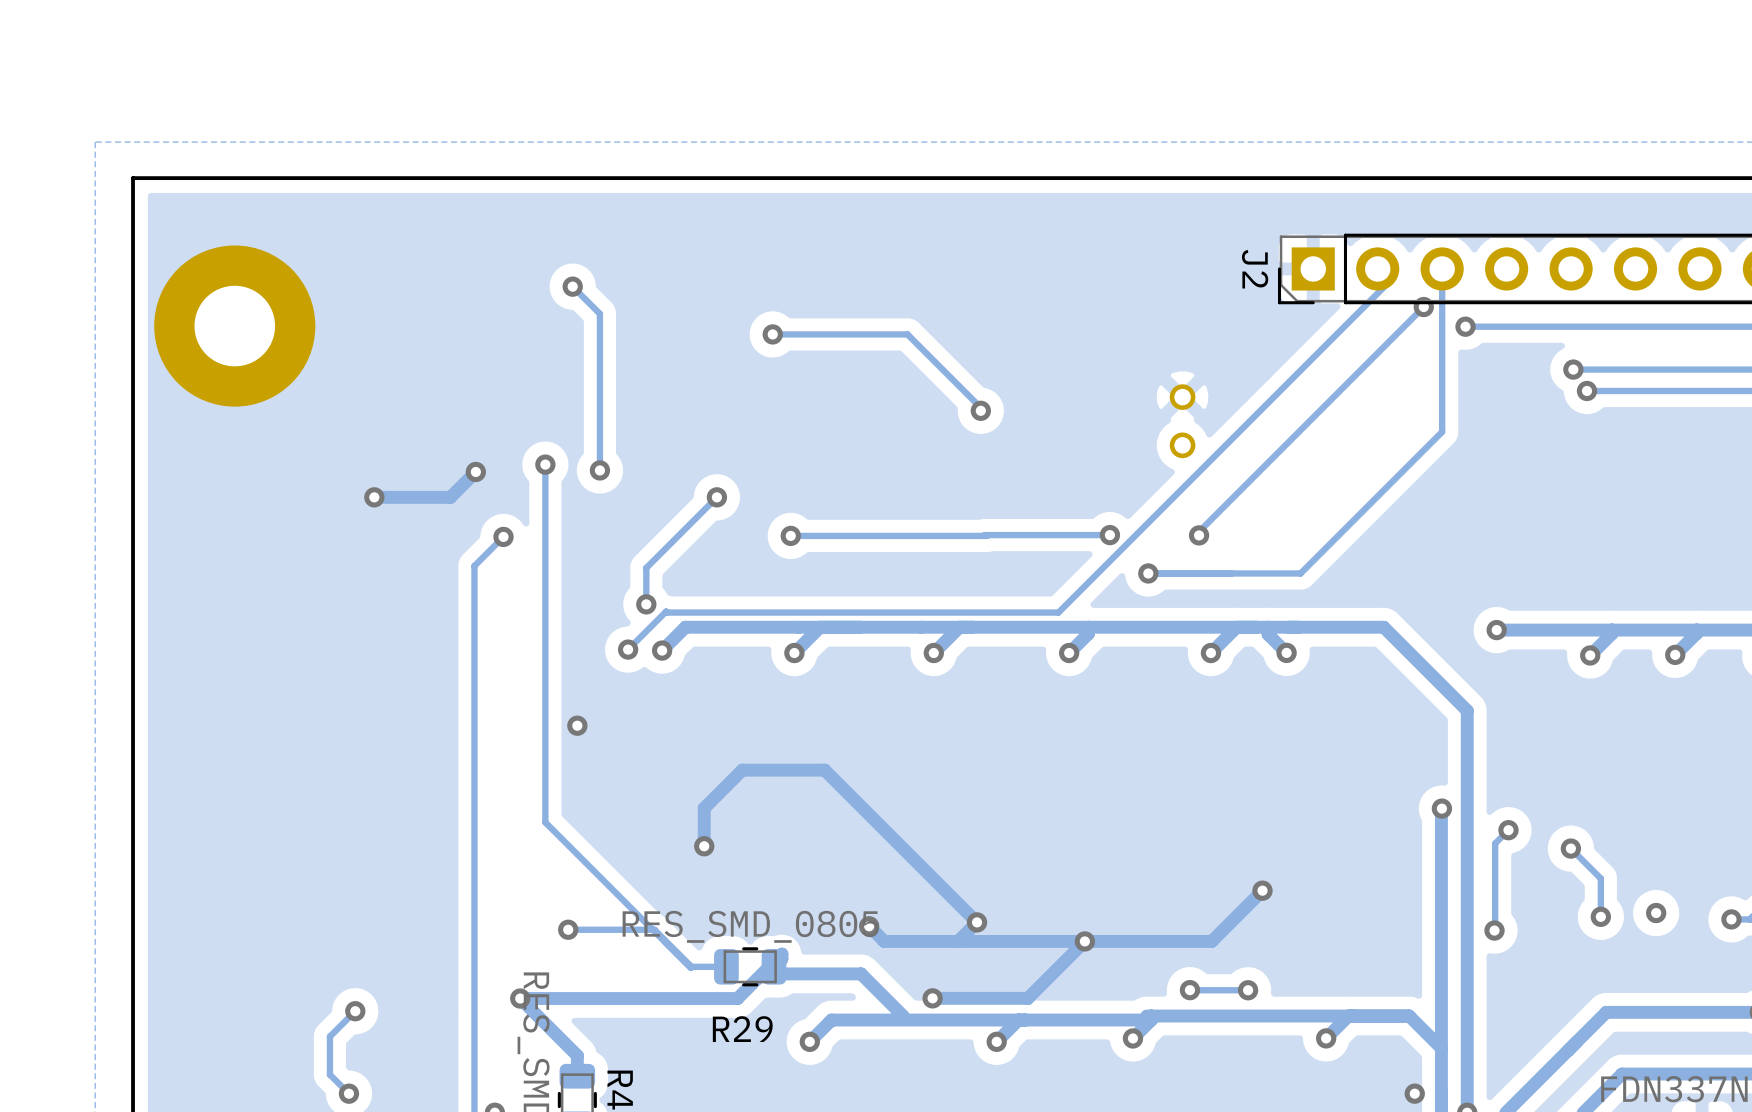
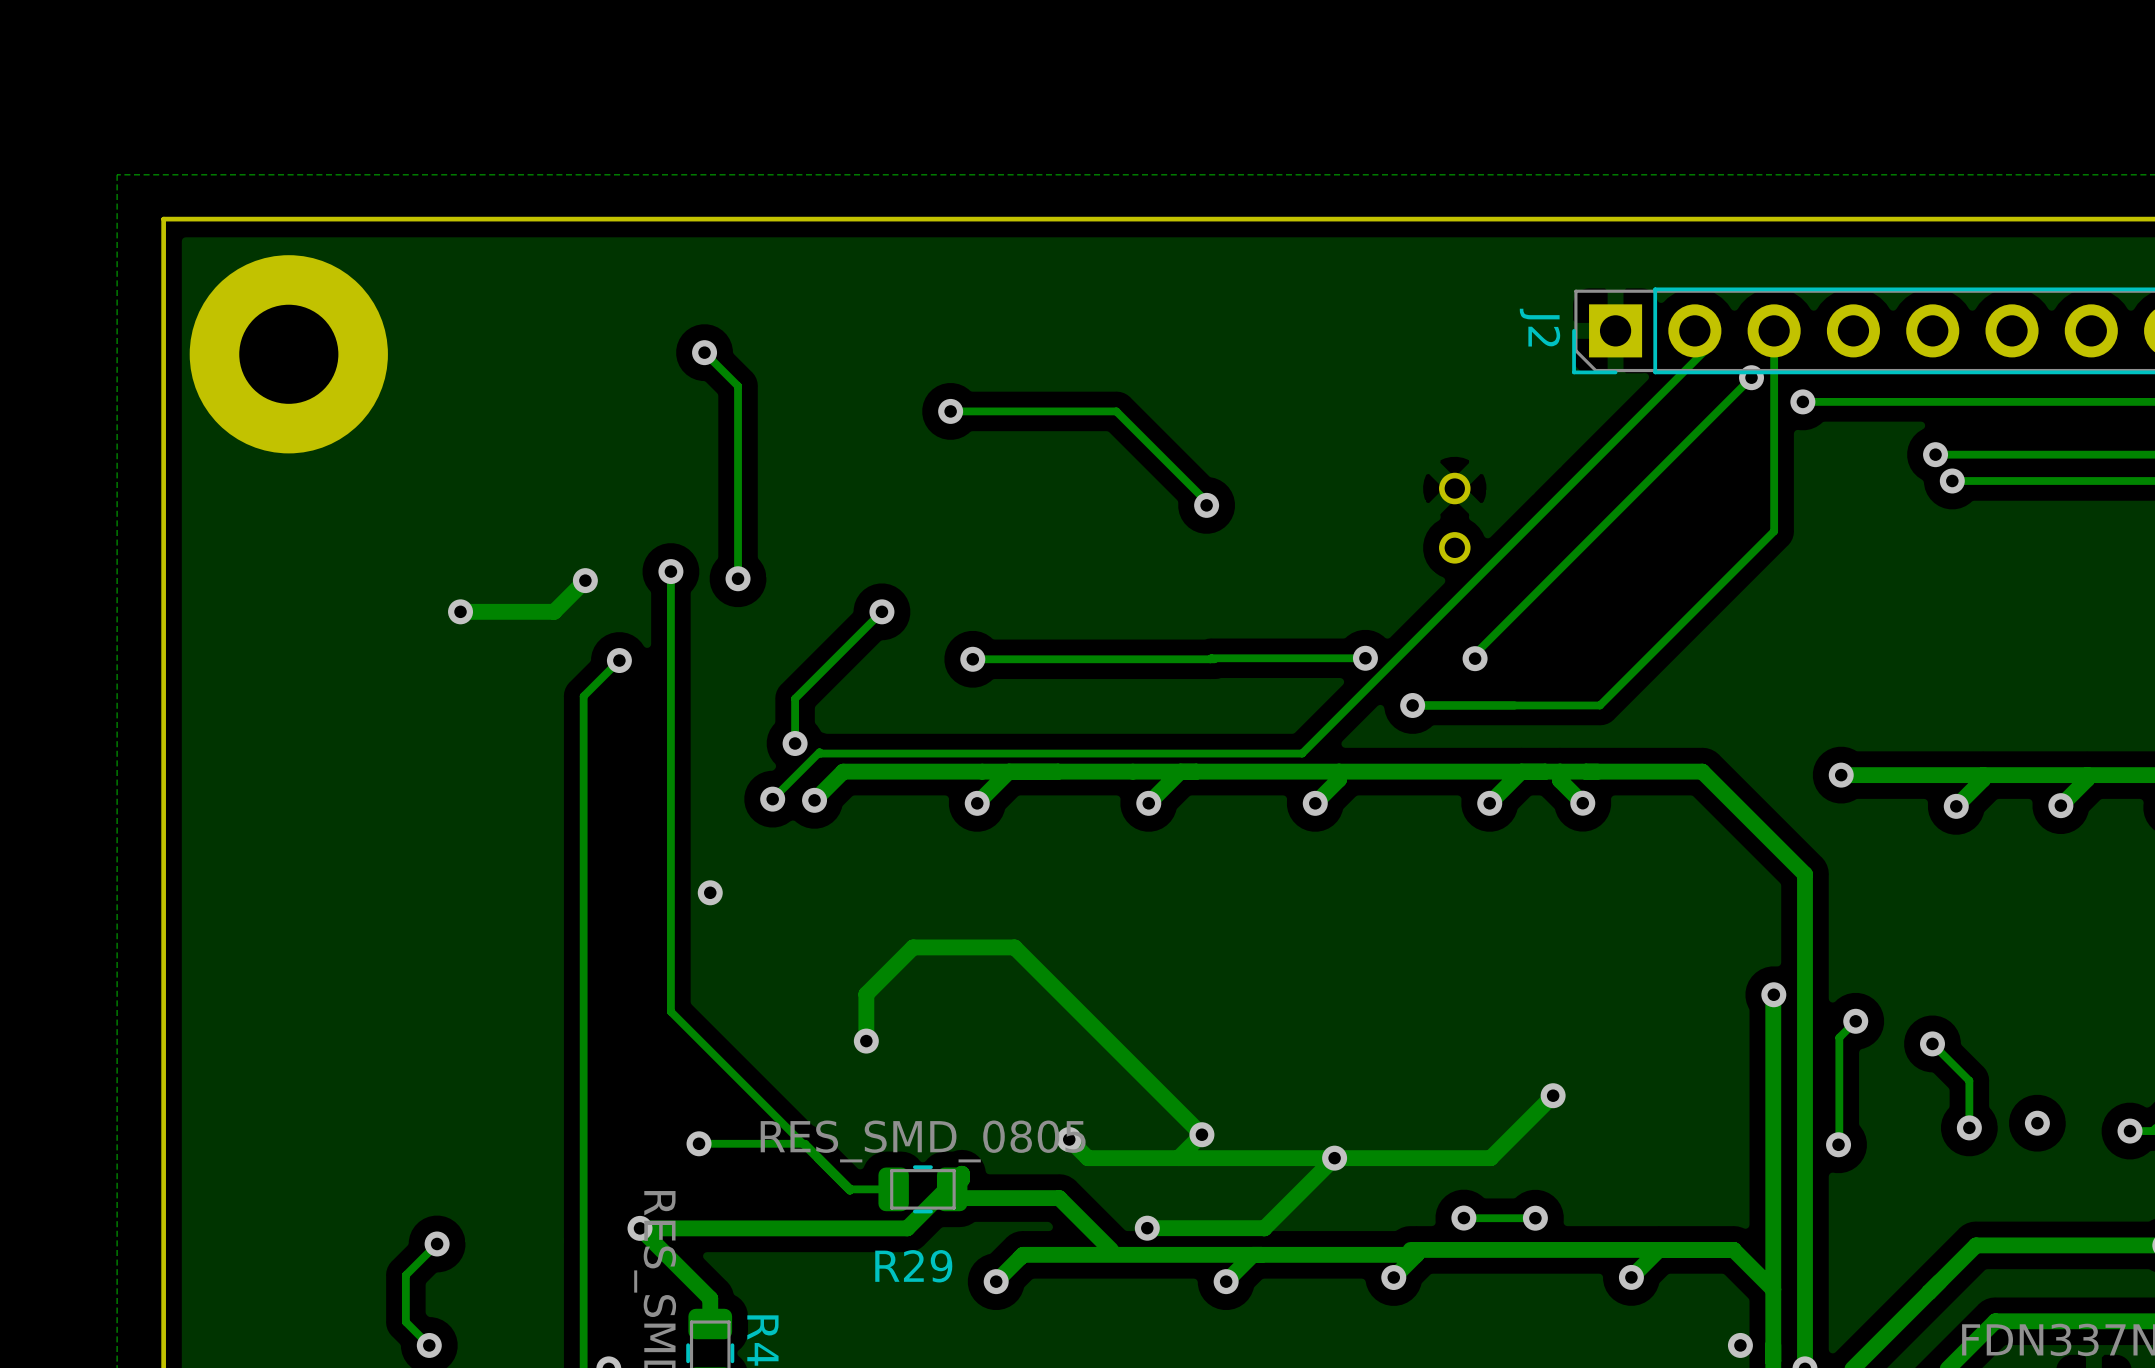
part position: (234, 326) -> (288, 354)

